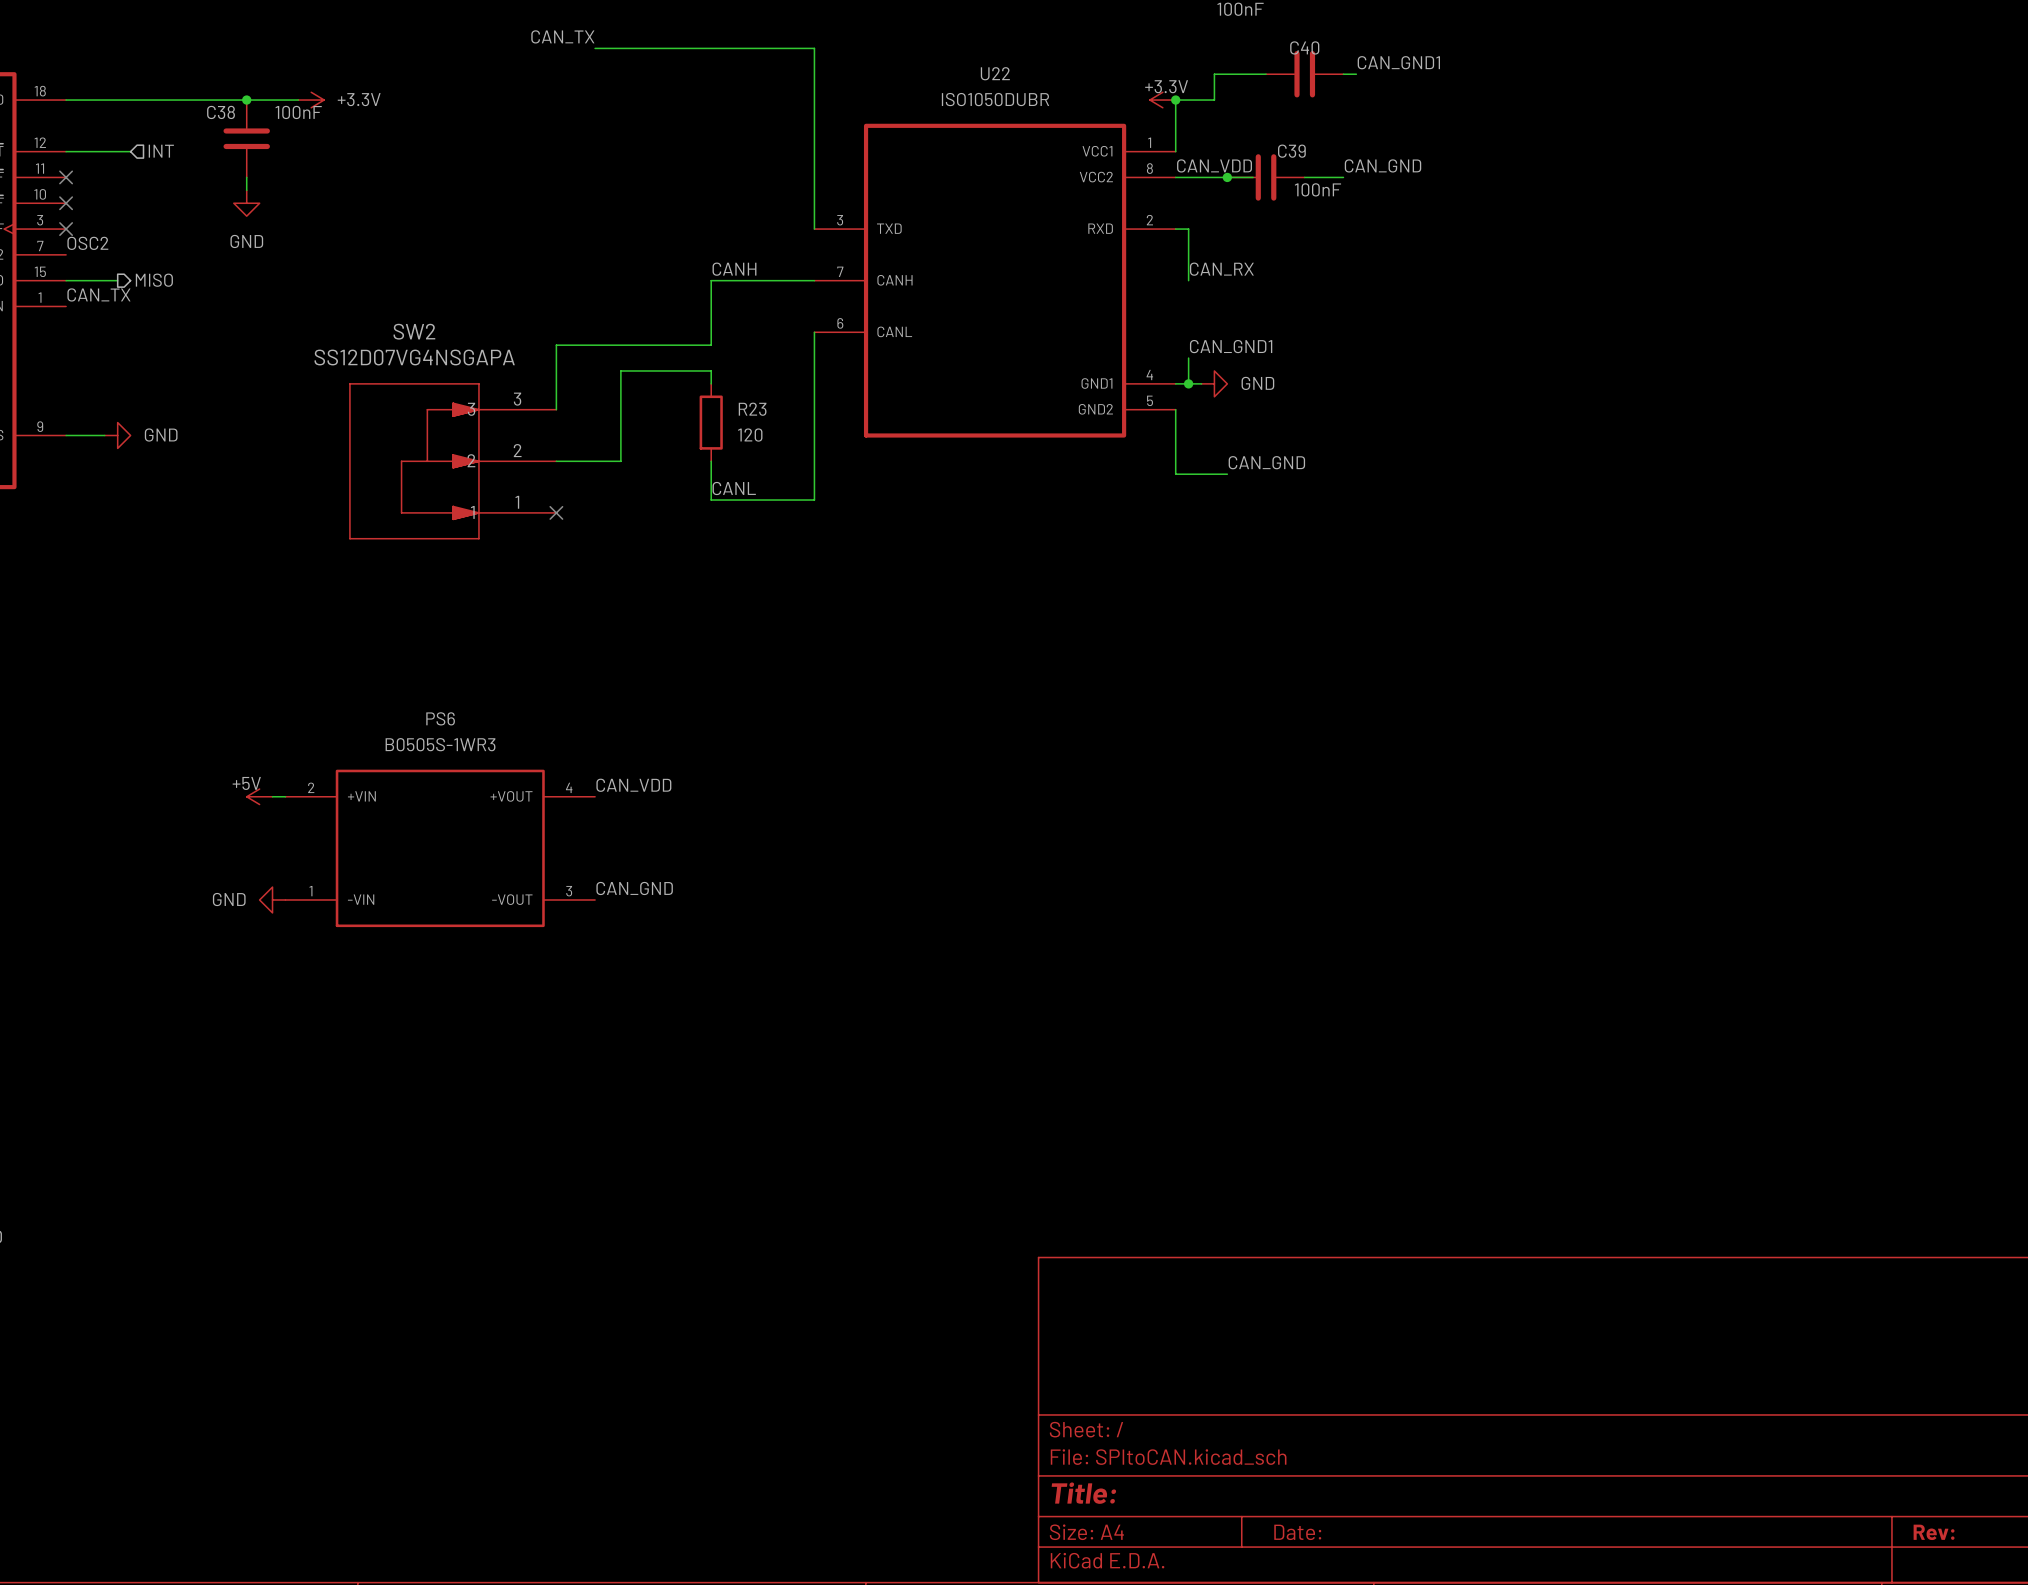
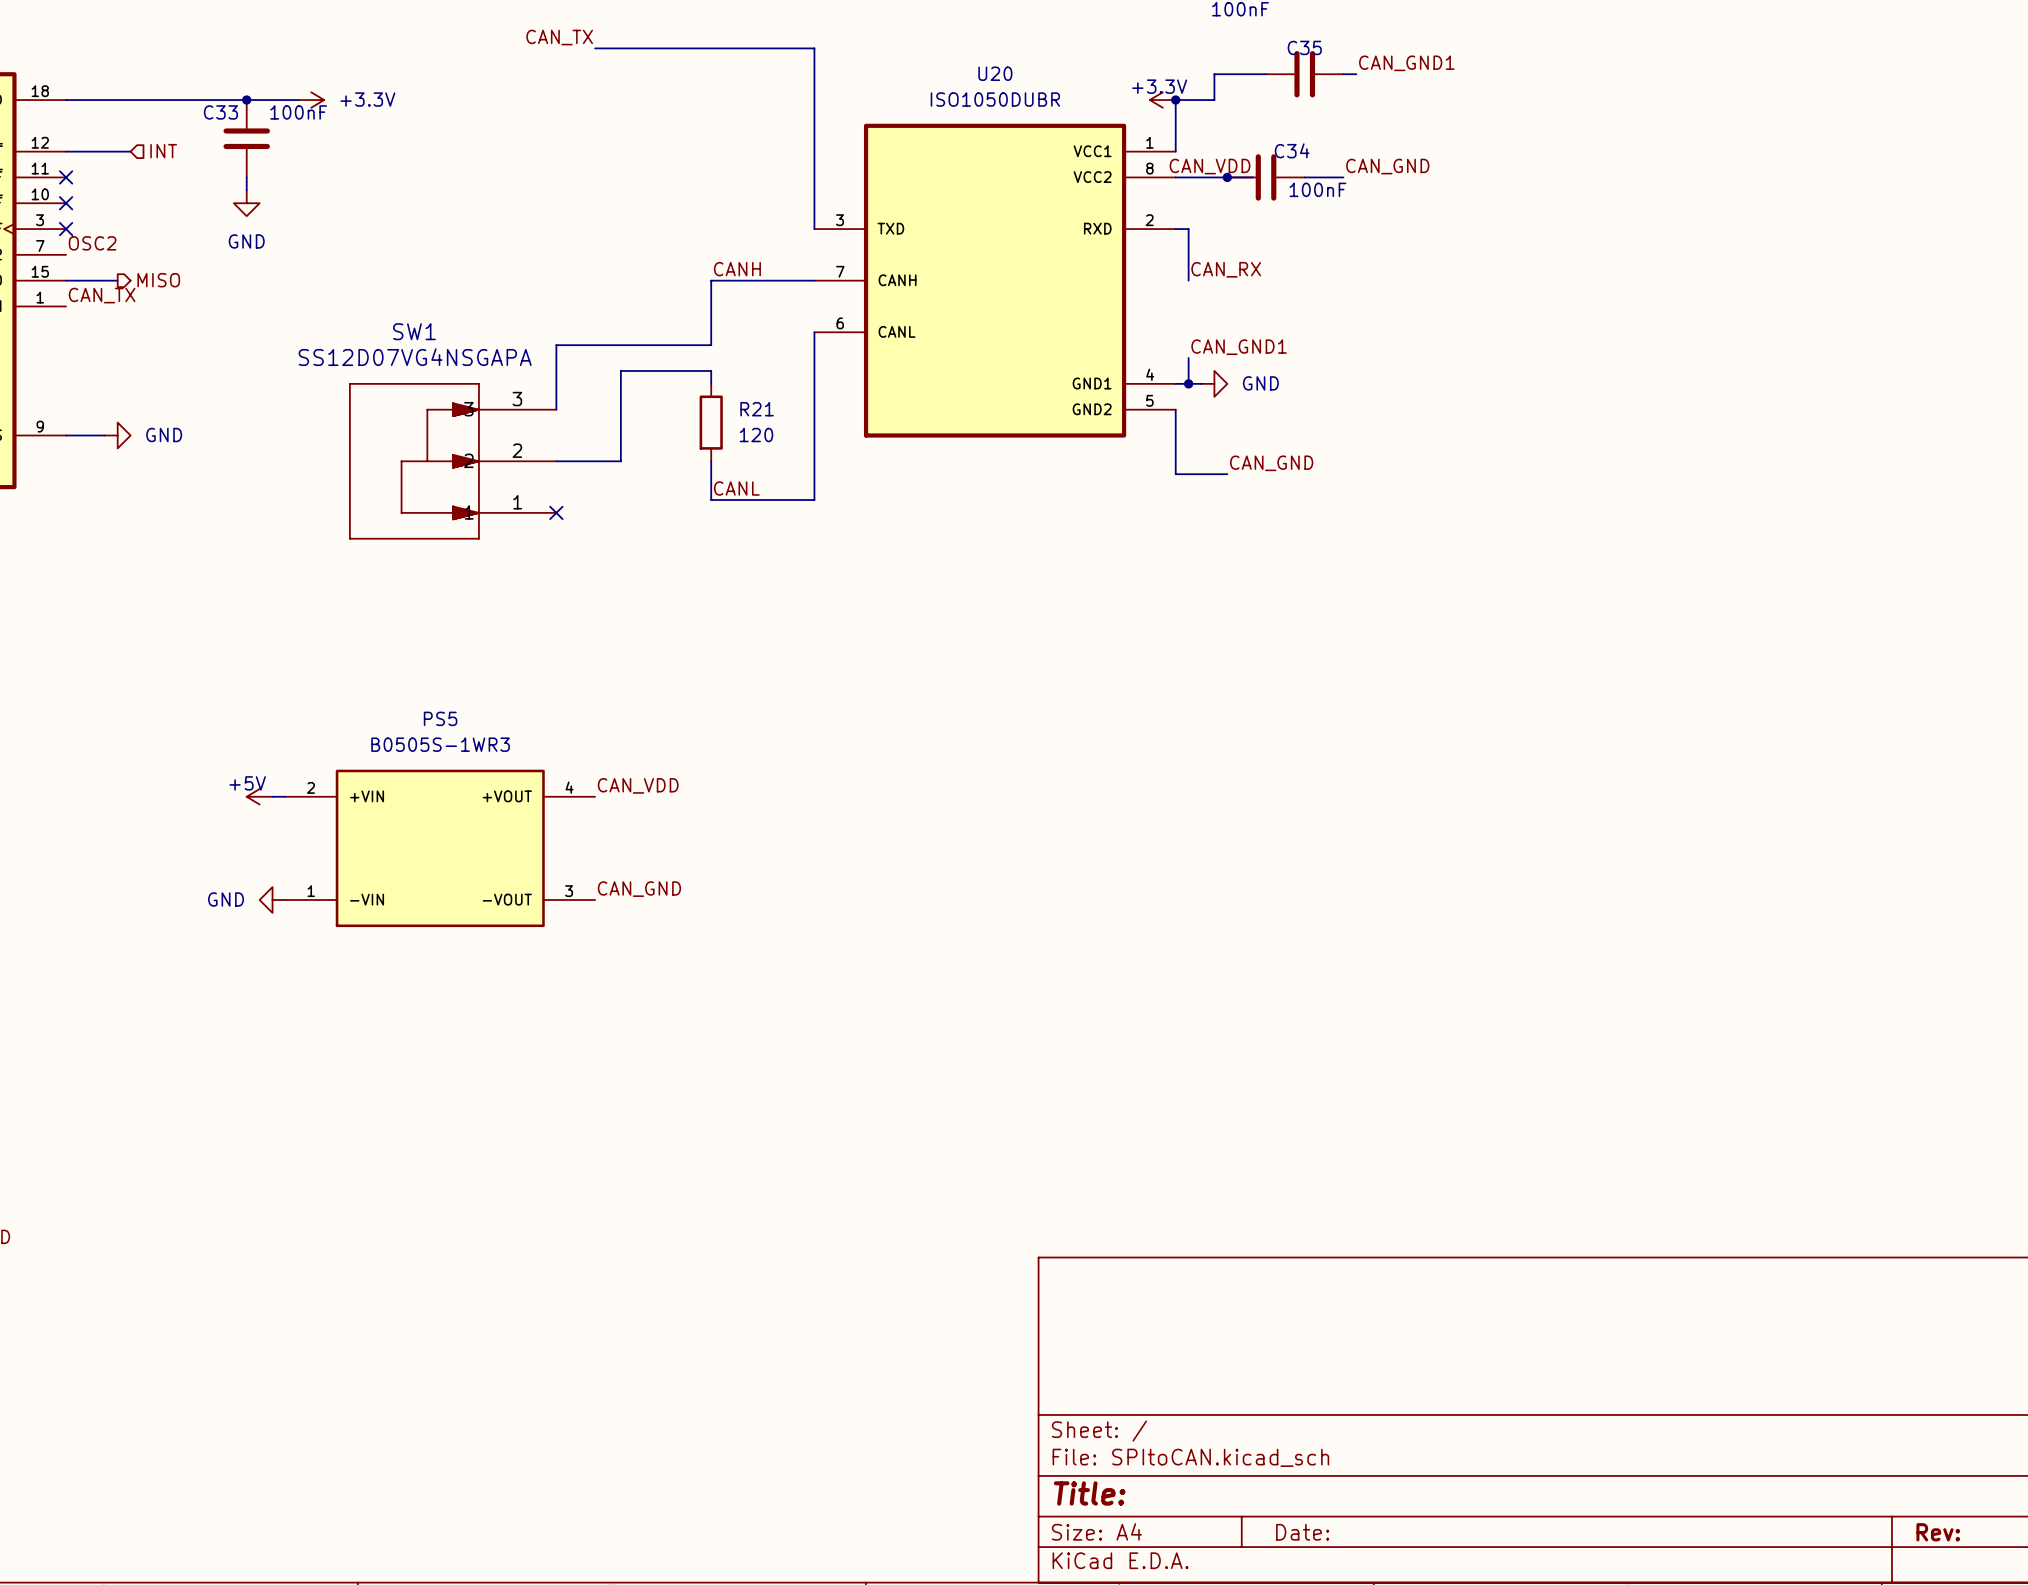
C40 name: C40 (1304, 47) -> C35 (1304, 47)
U22 name: U22 (995, 73) -> U20 (995, 73)
C38 name: C38 (221, 112) -> C33 (220, 112)
C39 name: C39 (1291, 151) -> C34 (1292, 150)
SW2 name: SW2 (414, 331) -> SW1 (414, 331)
R23 name: R23 (752, 409) -> R21 (757, 409)
PS6 name: PS6 (440, 718) -> PS5 (440, 718)

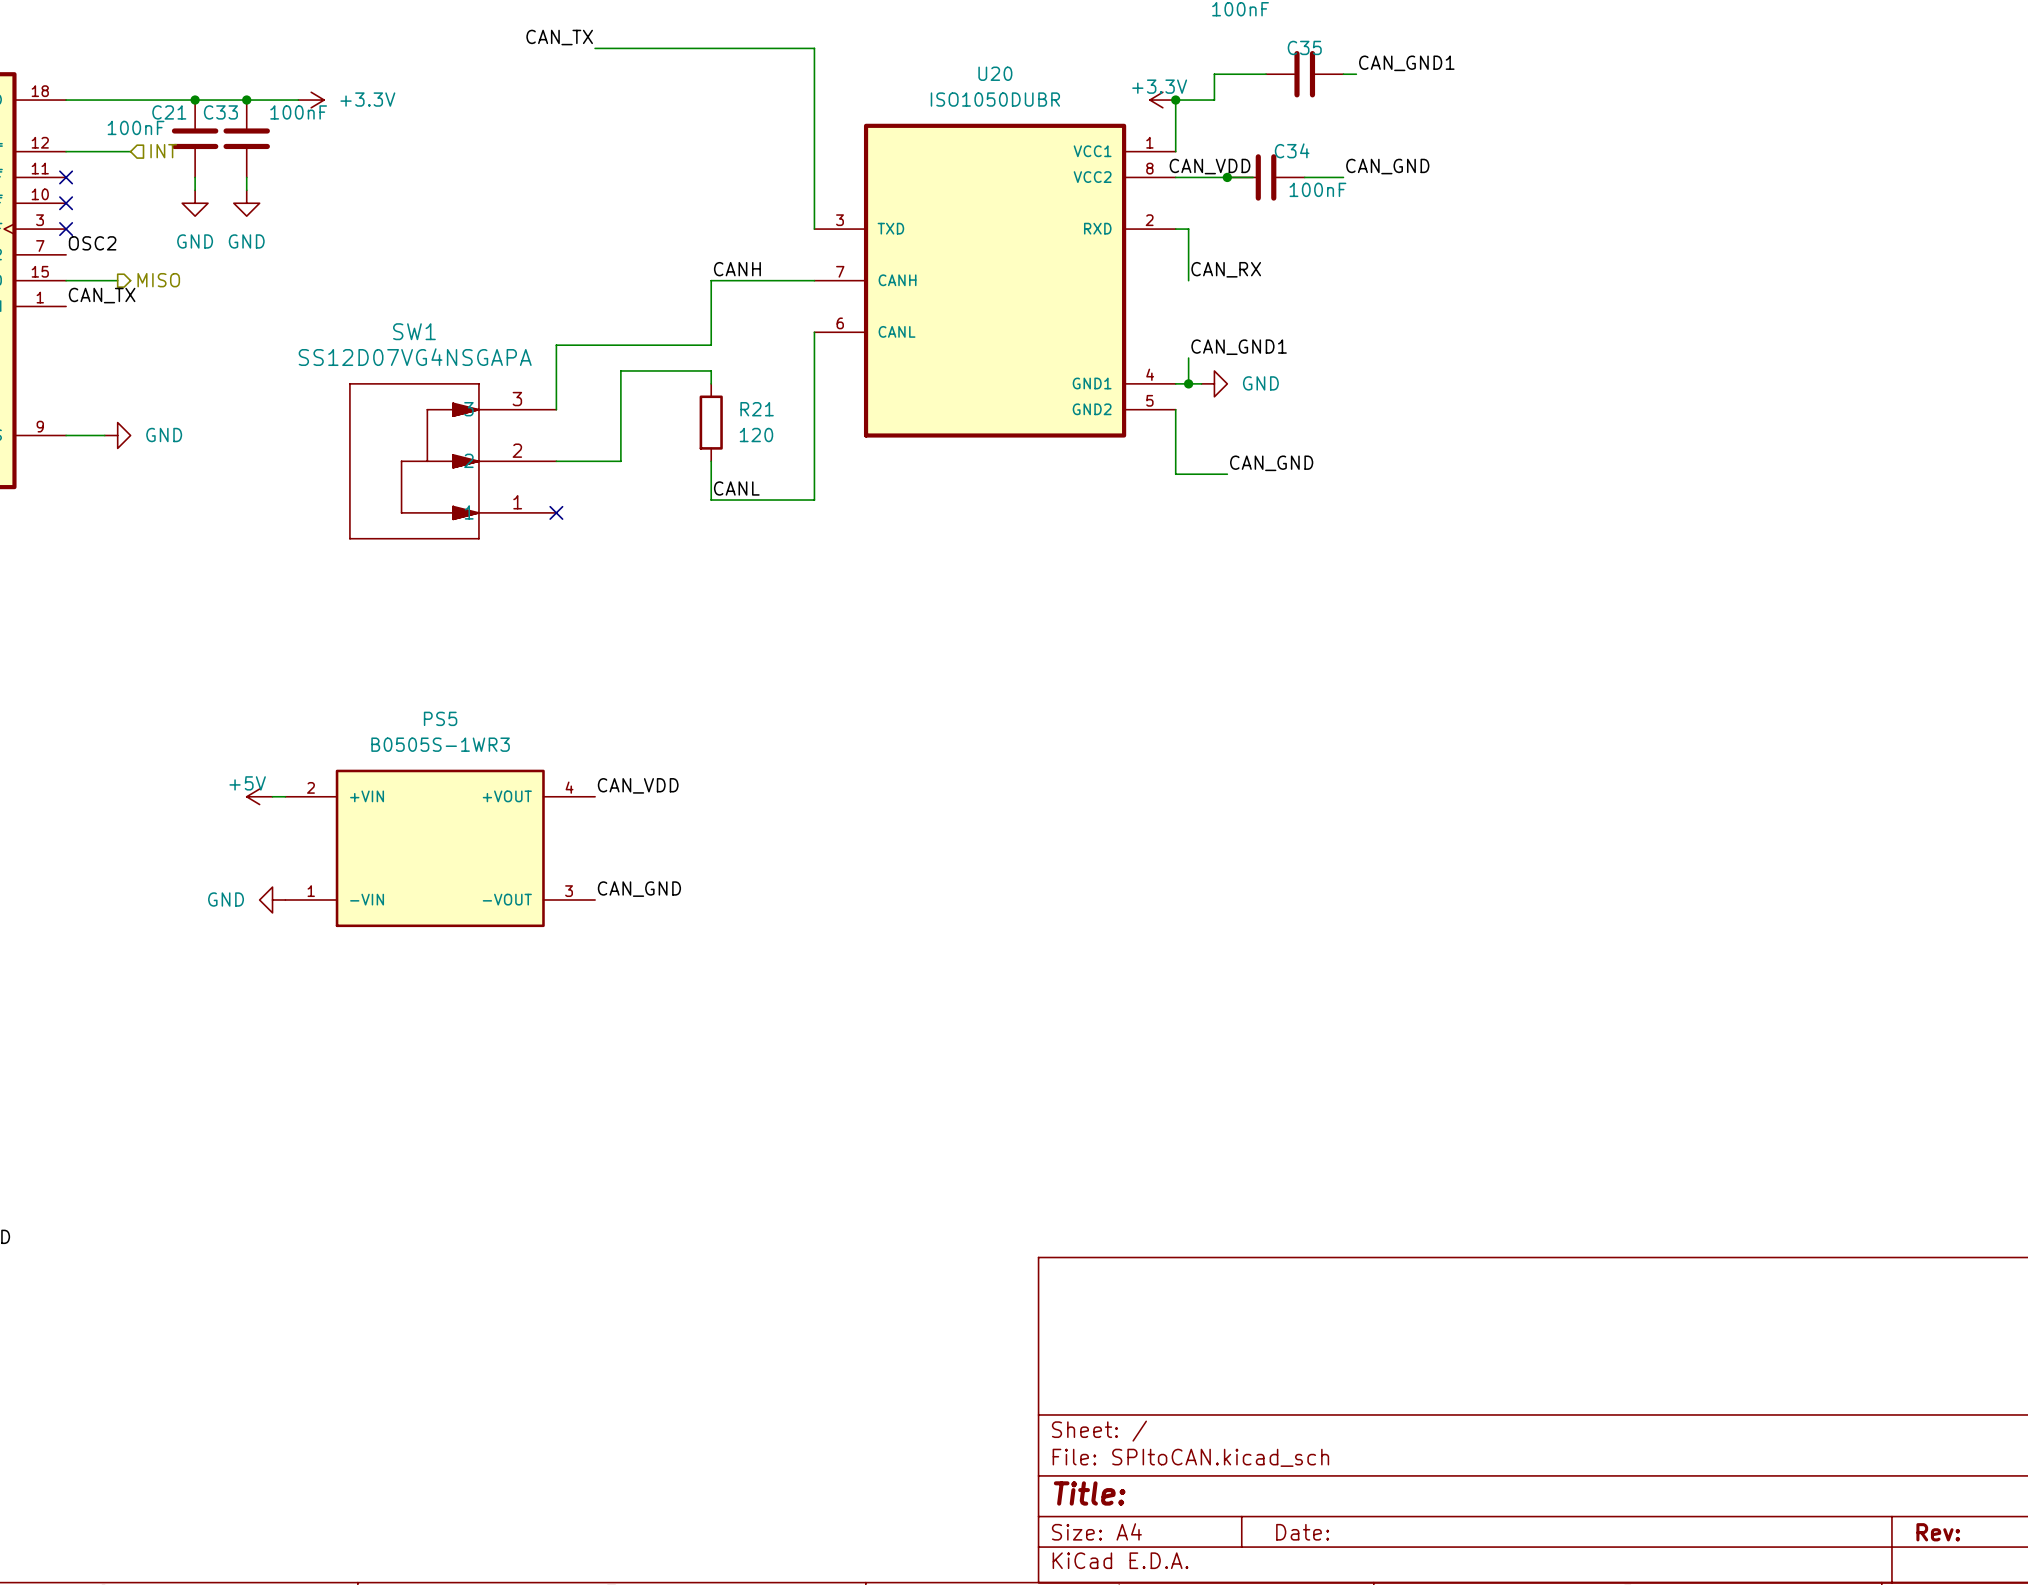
junction: none -> (195, 100)
C21: none -> 100nF (195, 138)
wire: none -> (195, 177) (195, 190)
power symbol: none -> GND (195, 203)

